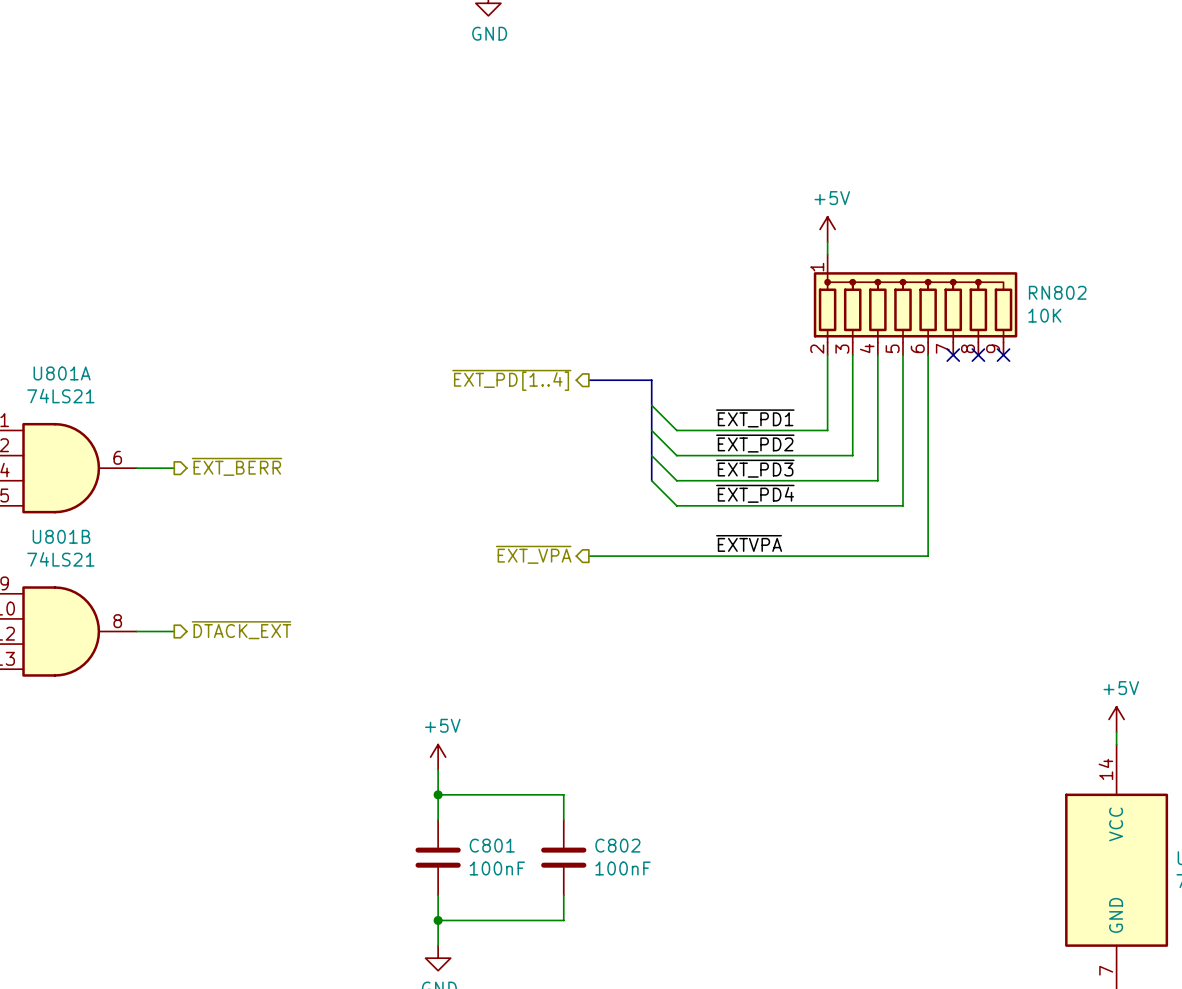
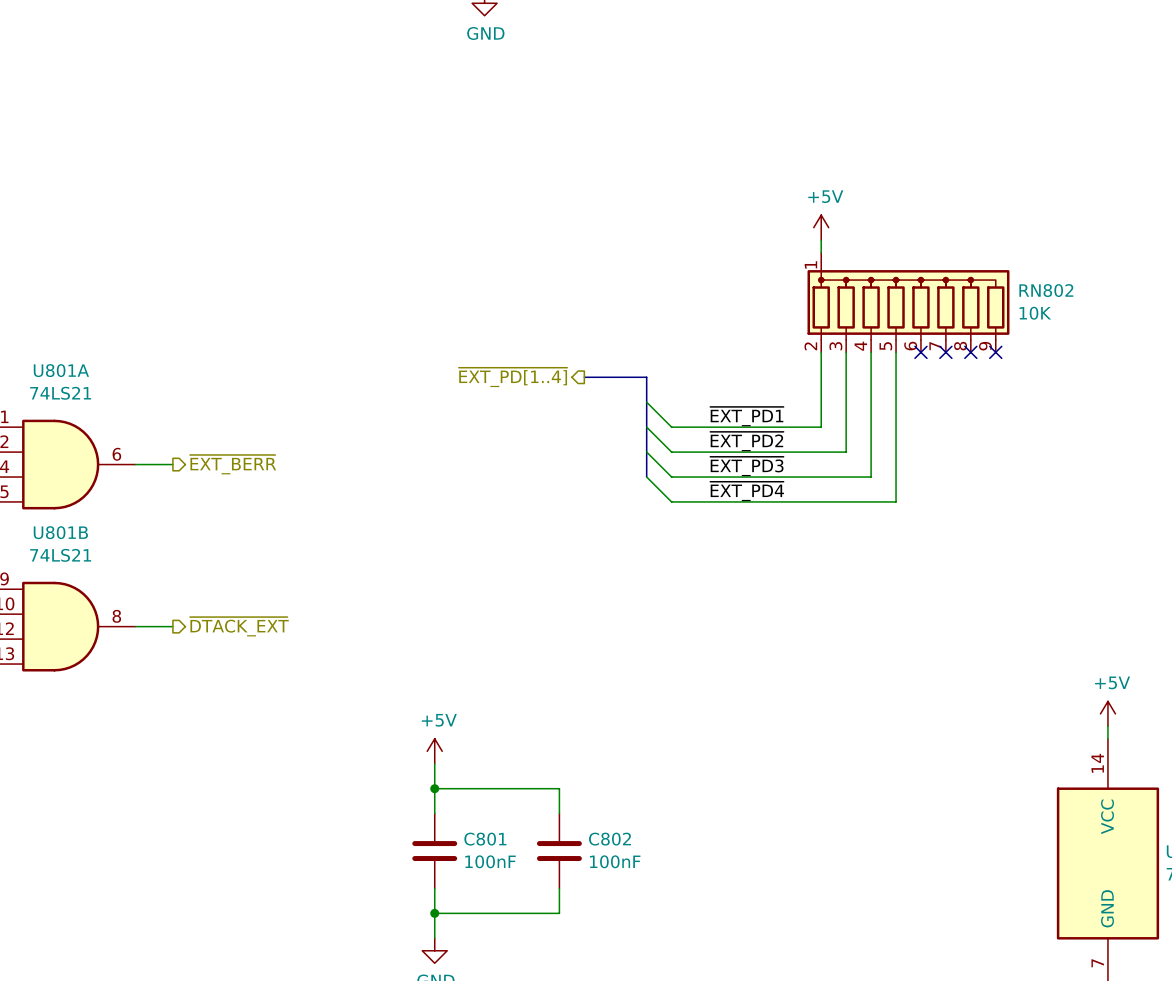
wire: (928, 355) (928, 556) (588, 556) -> none
no-connect mark: none -> (920, 352)
label: ~{EXTVPA} (749, 543) -> none
hierarchical label: ~{EXT_VPA} (533, 554) -> none

